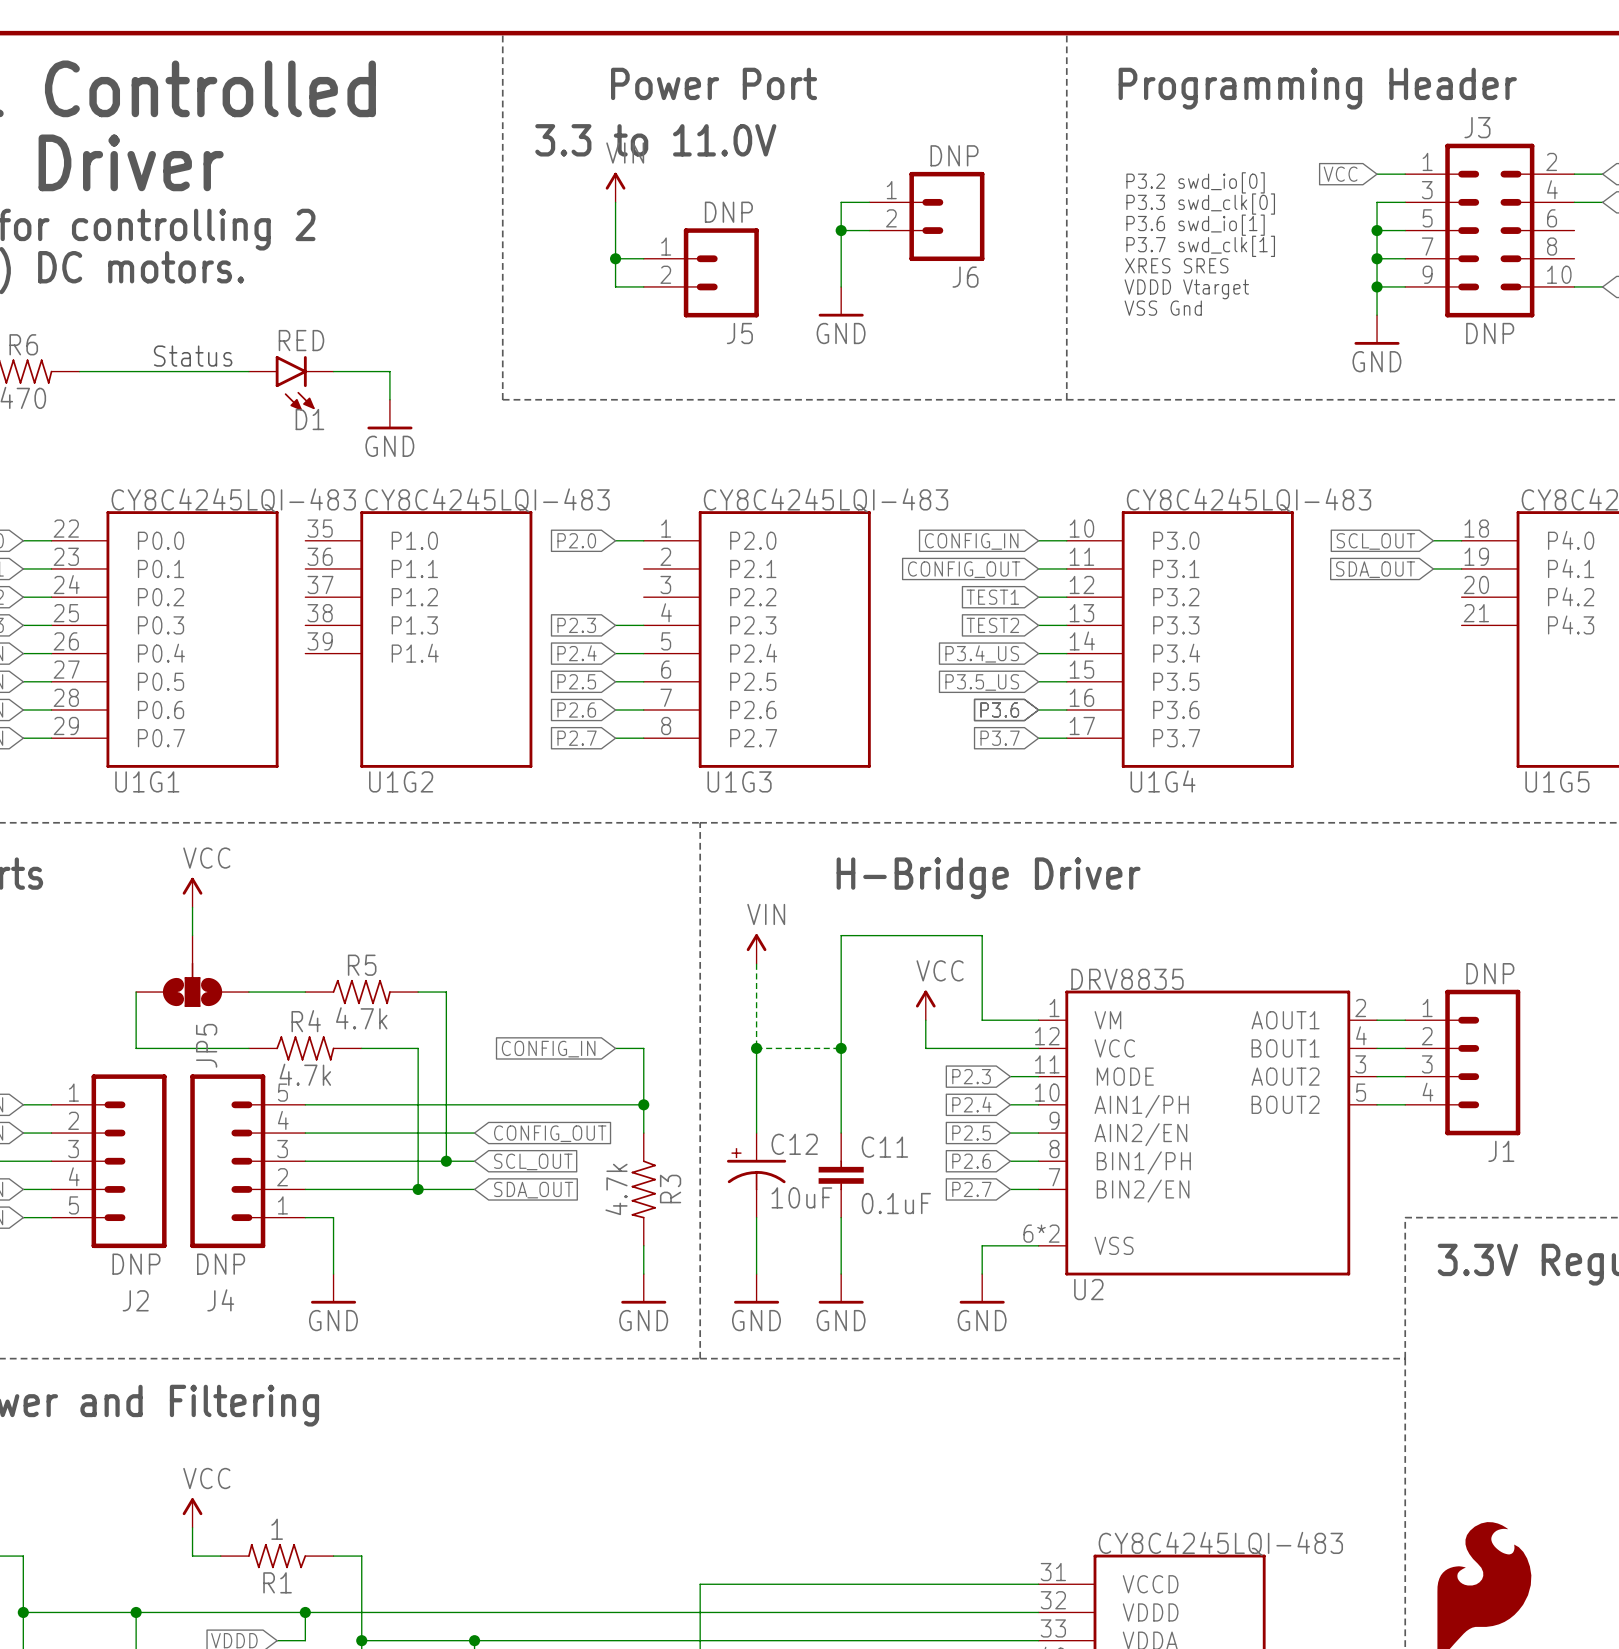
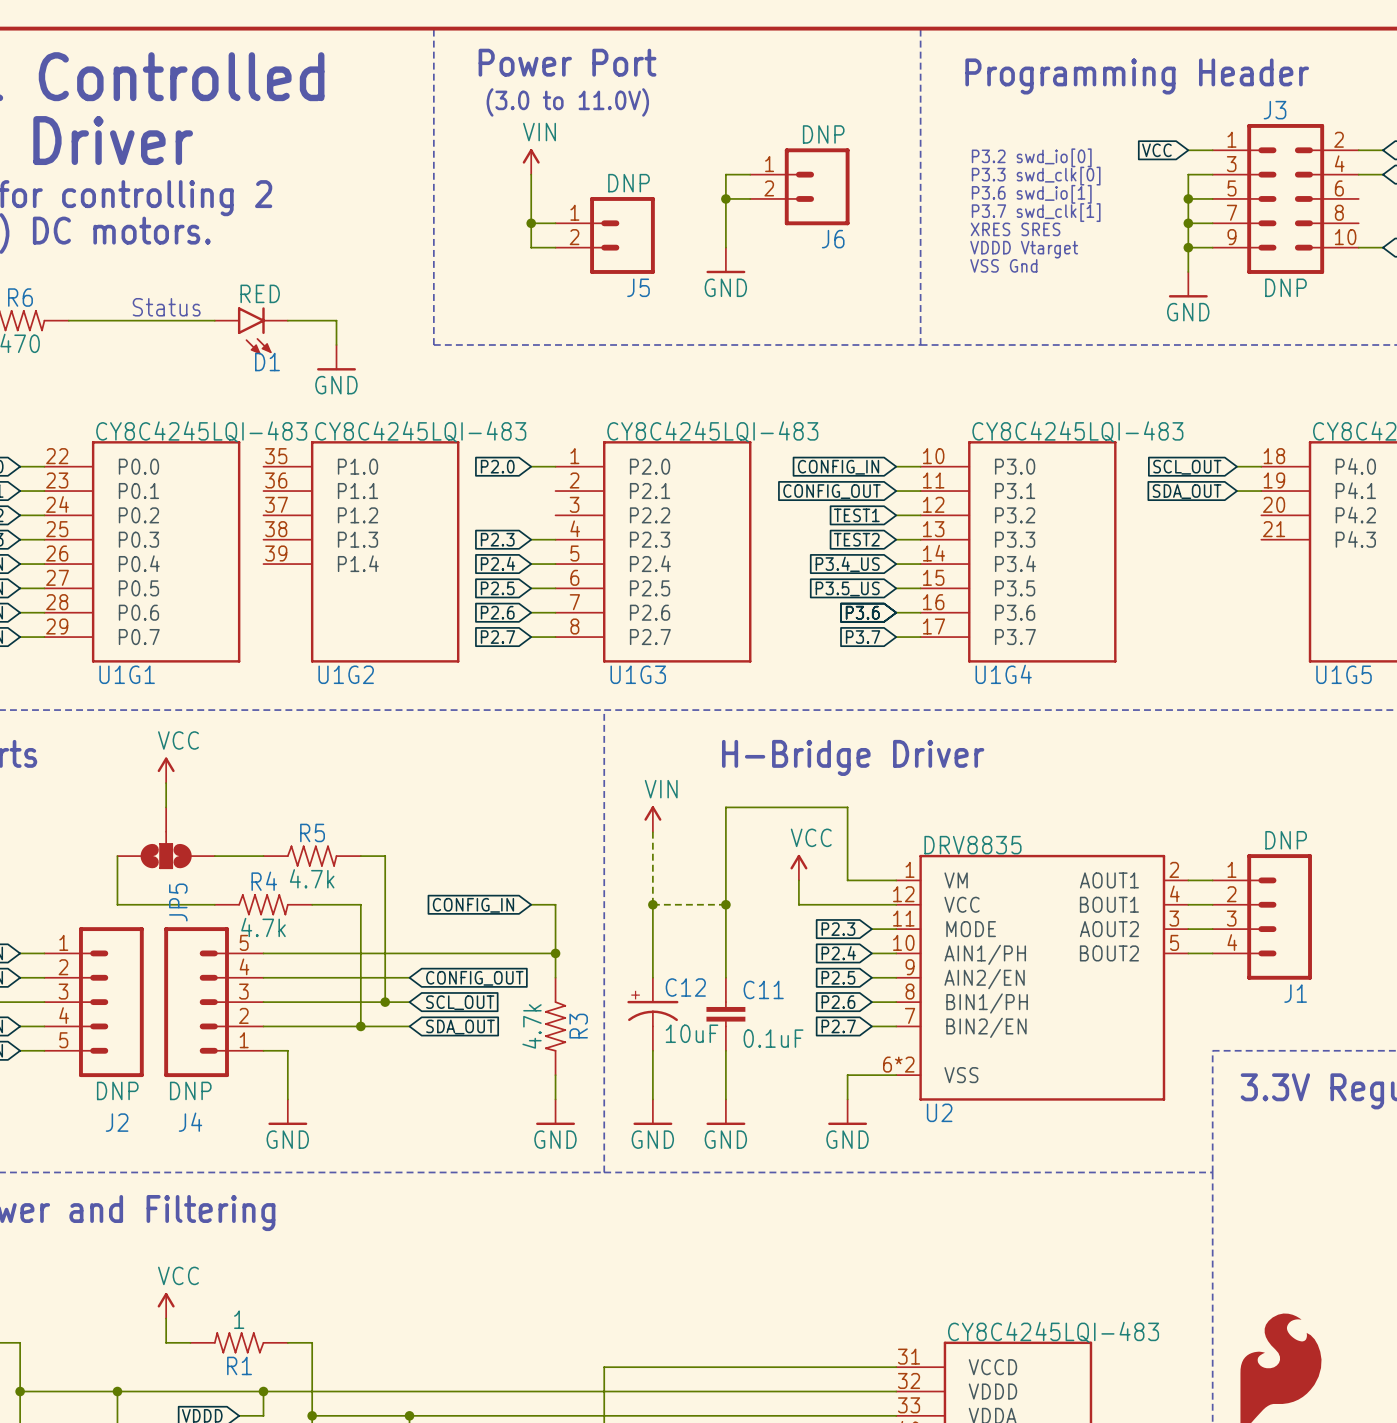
text position: Power Port (714, 83) -> Power Port (567, 62)
text: 3.3 to 11.0V (655, 140) -> (3.0 to 11.0V) (567, 102)

